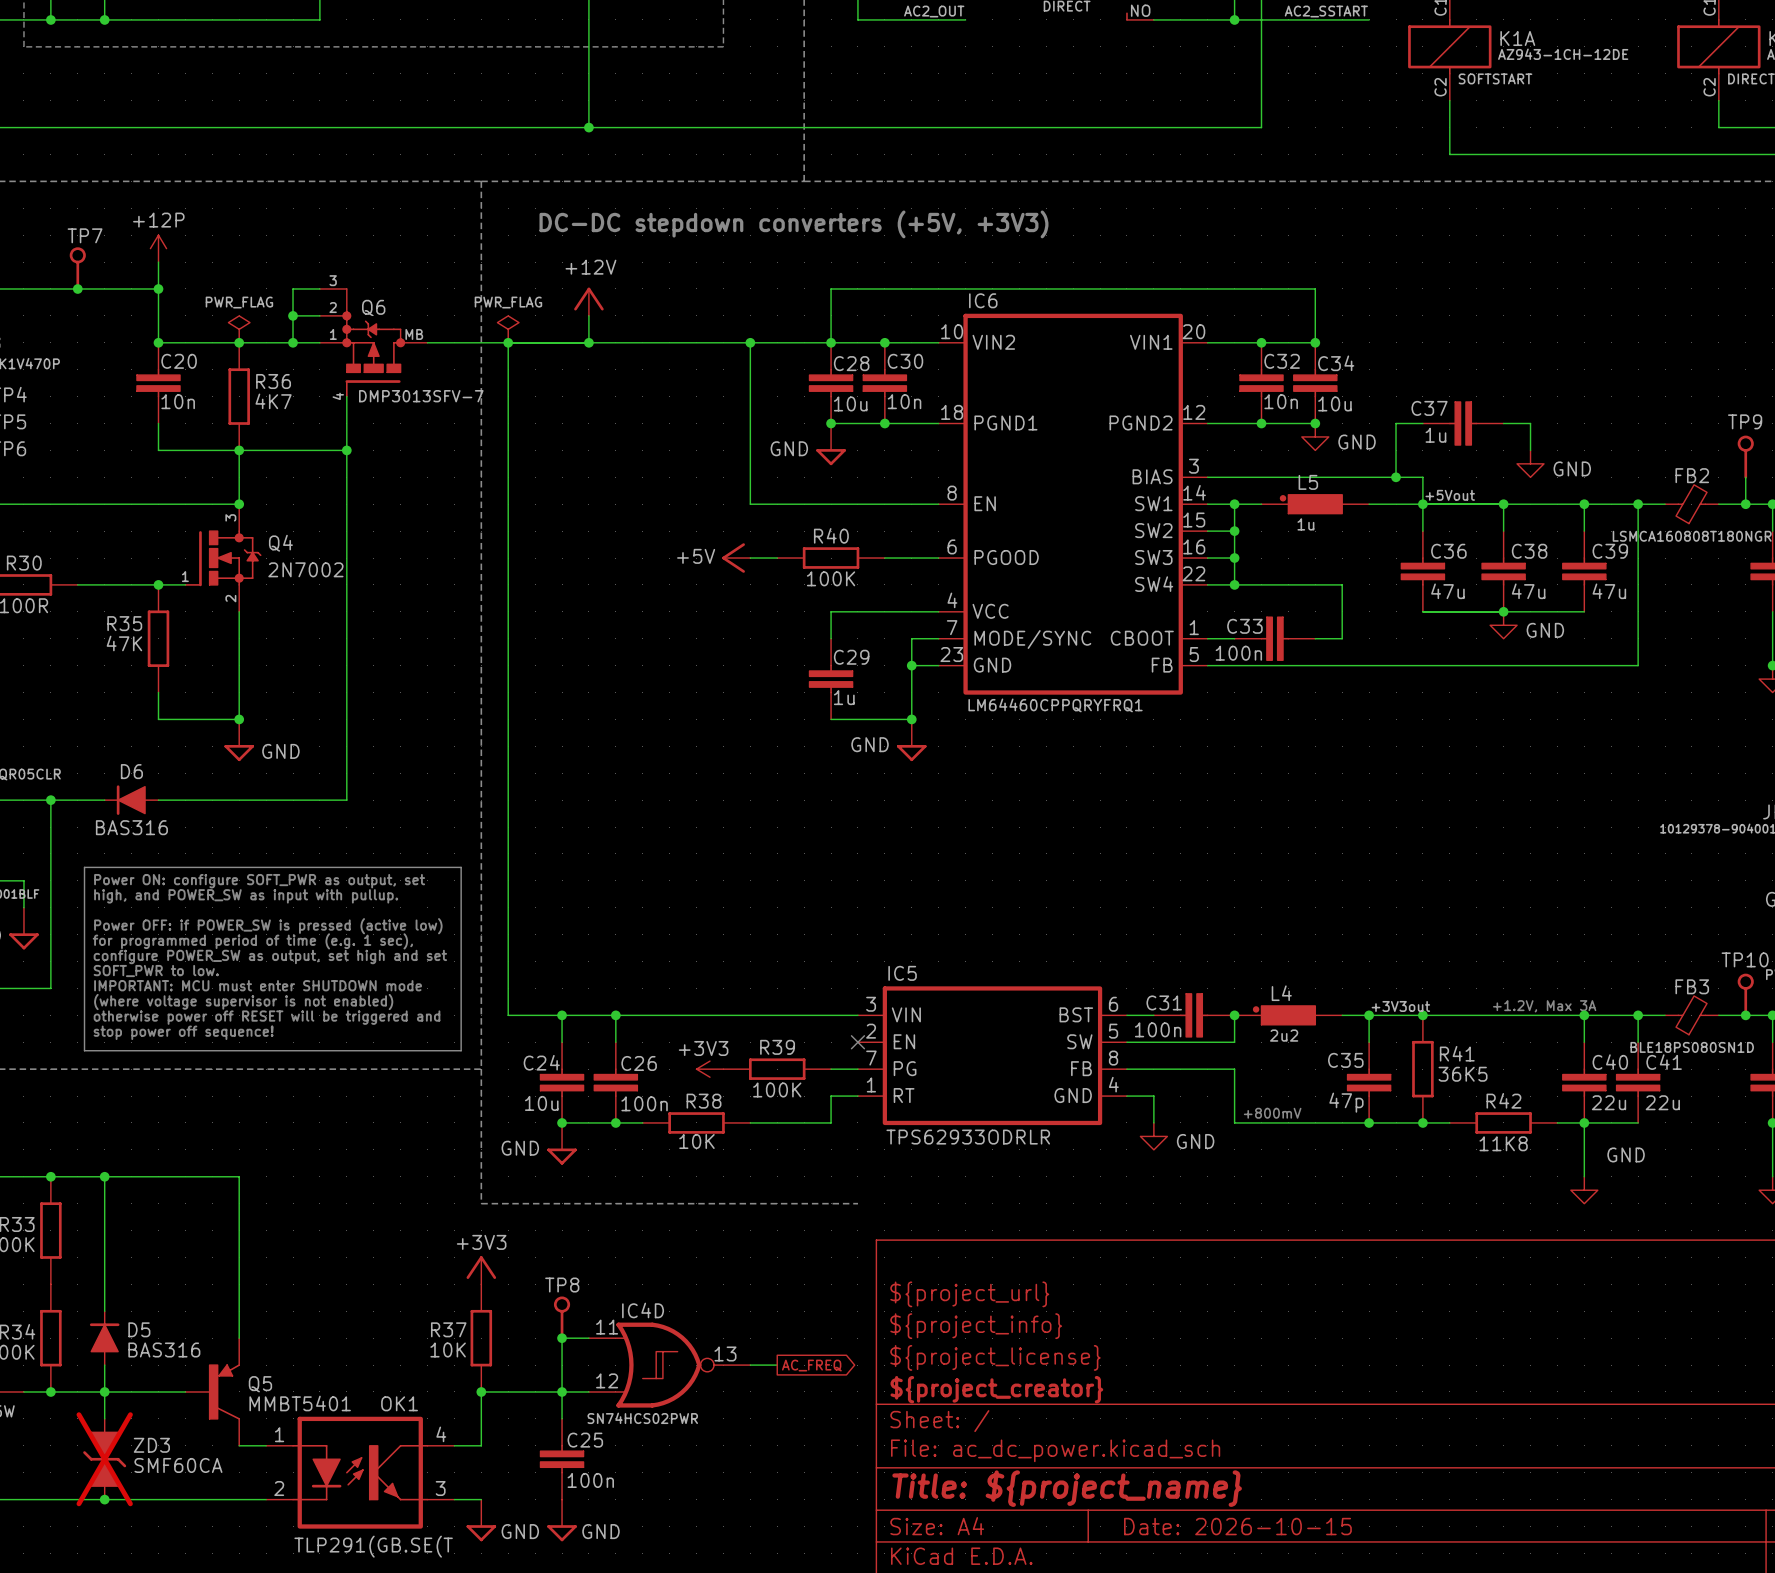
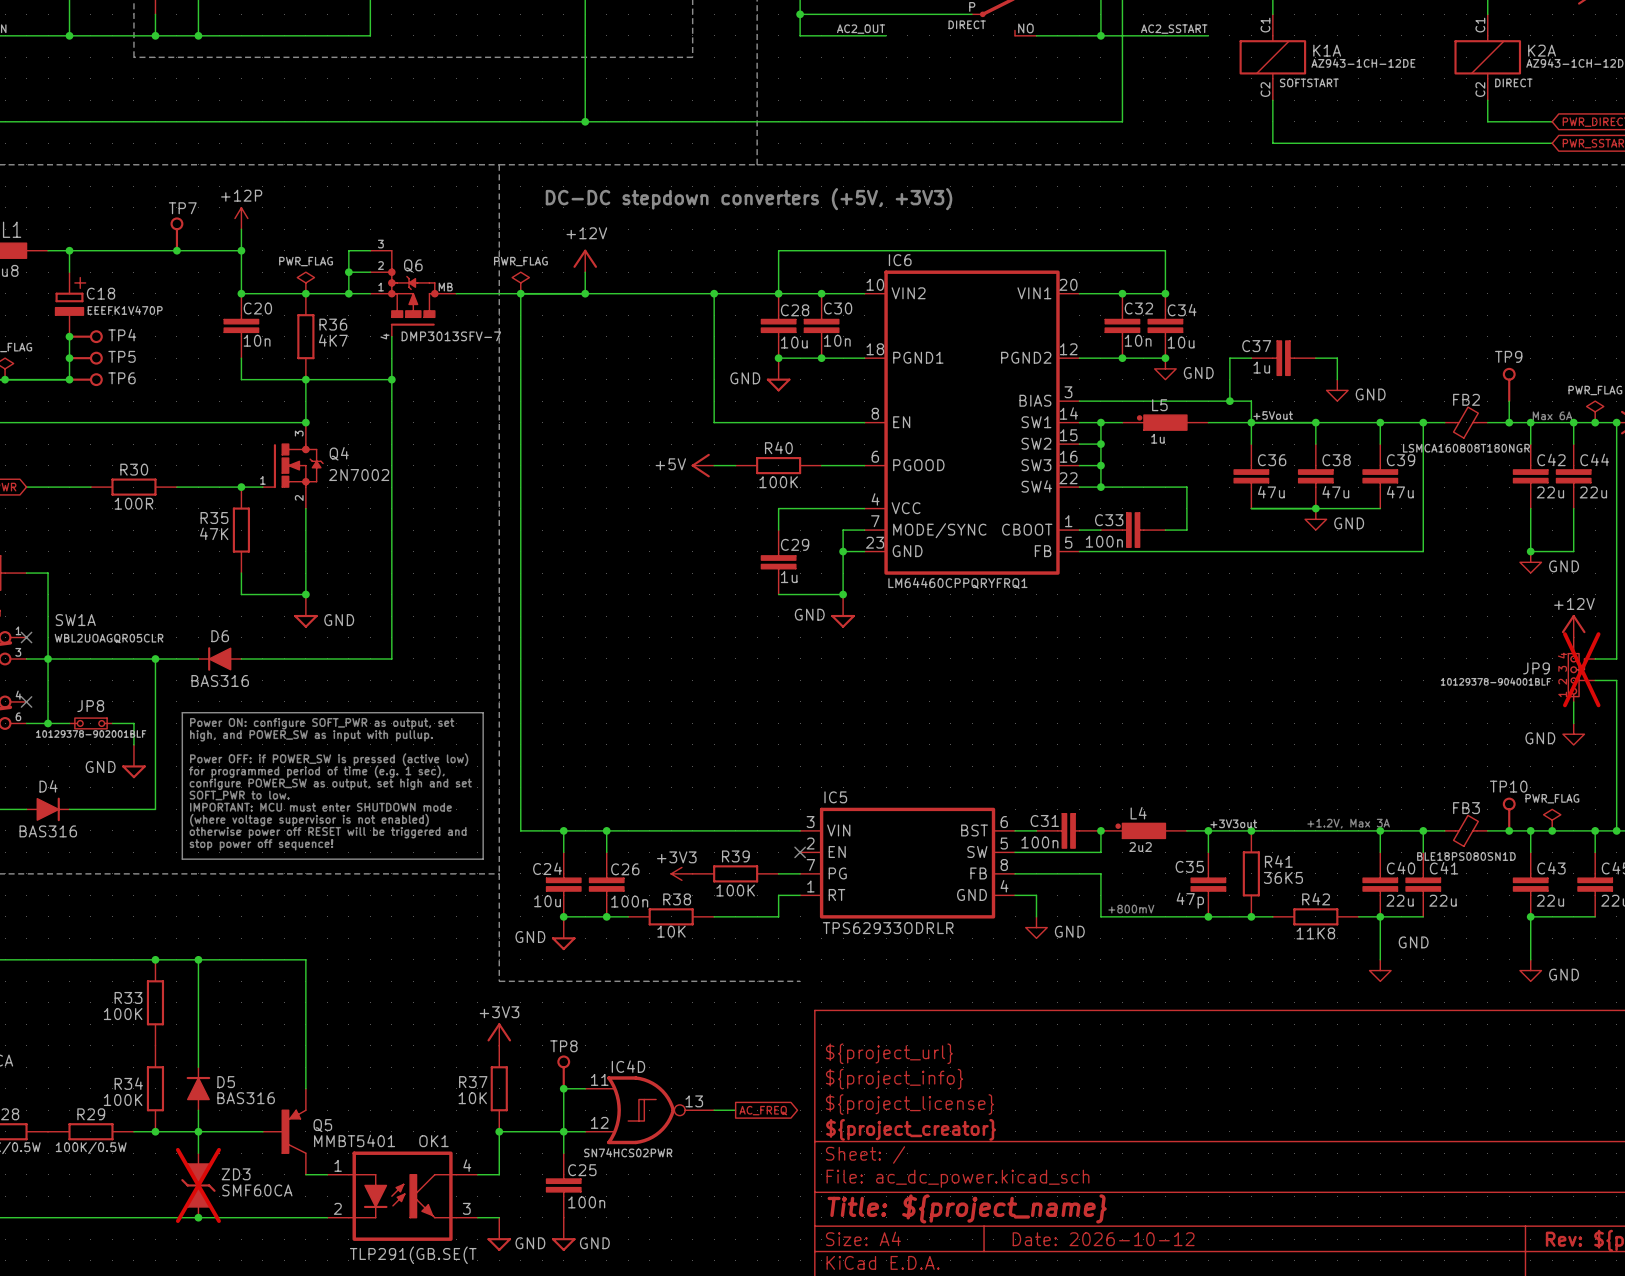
title block: Date: 2026-10-15 (1237, 1526) -> Date: 2026-10-12 (1103, 1239)

